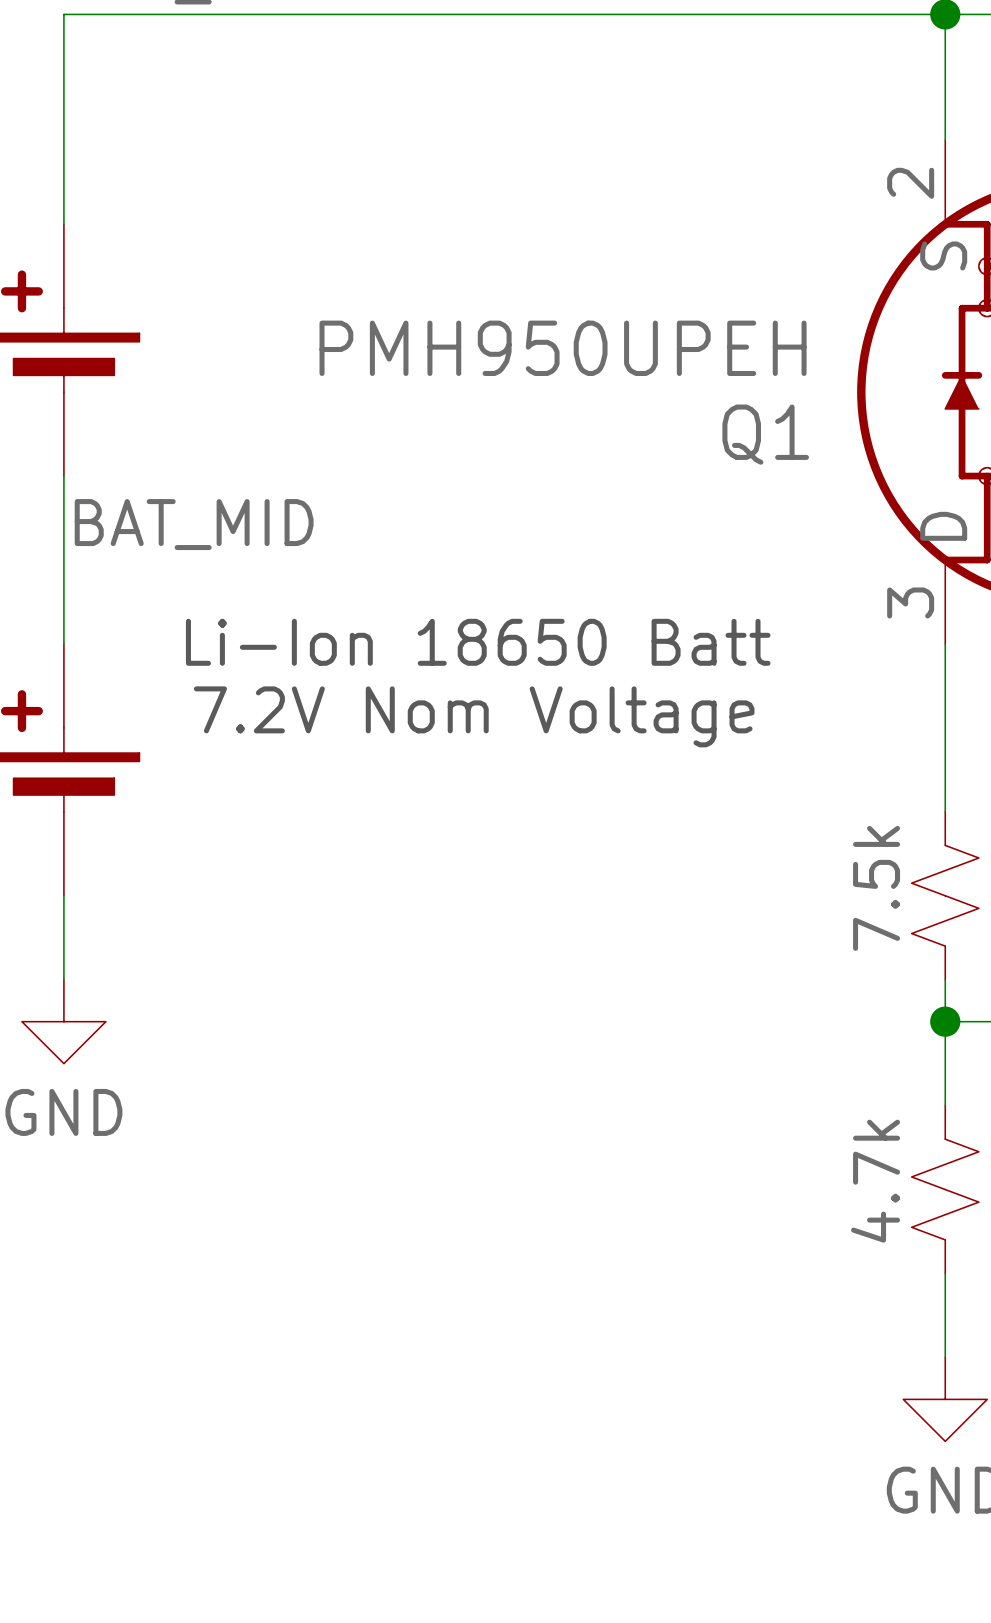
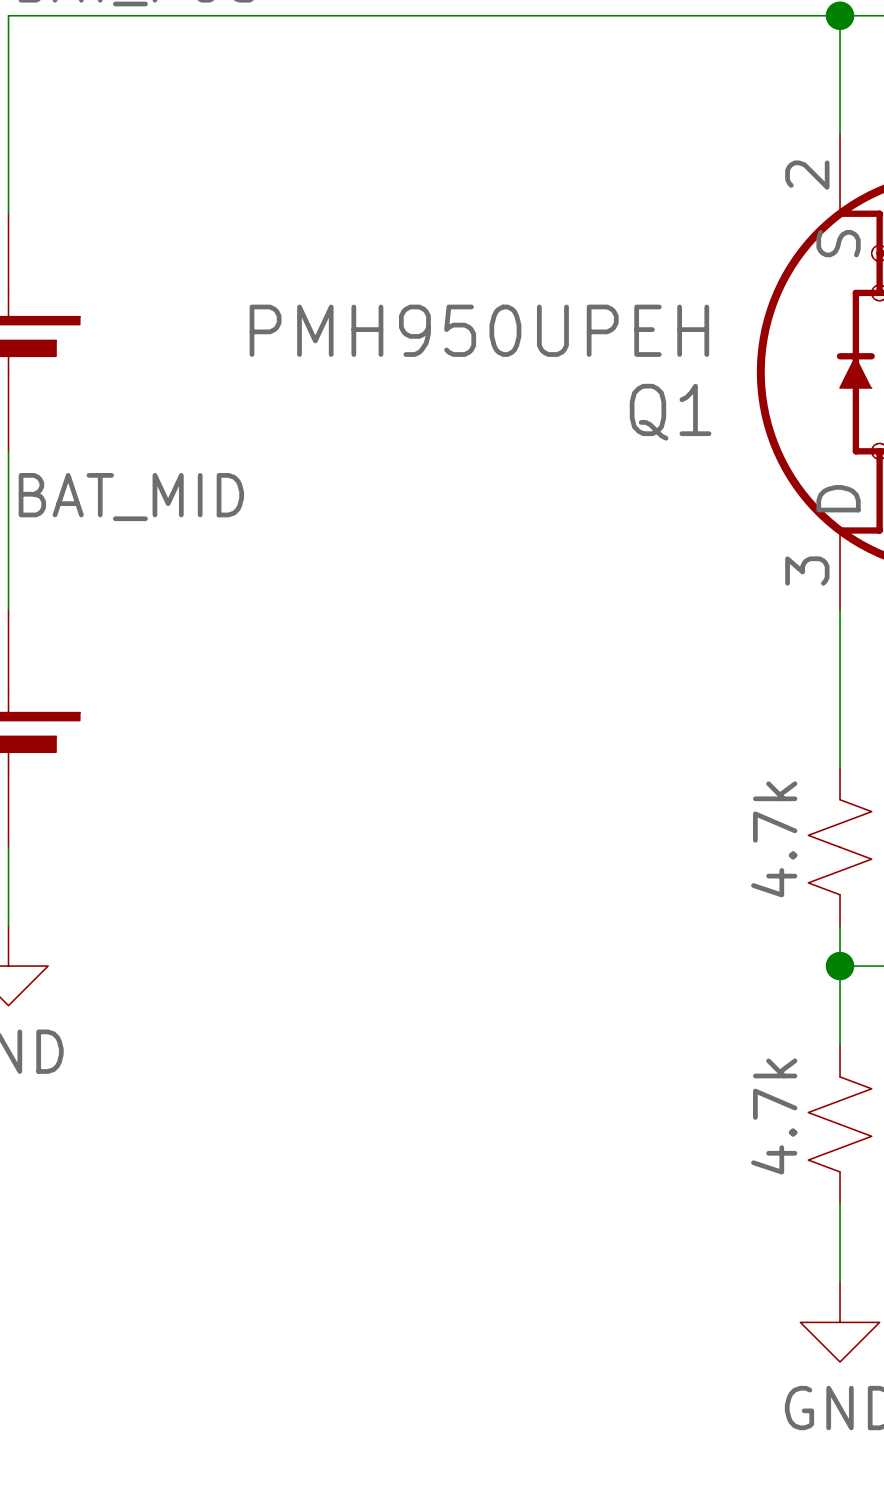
text: Li-Ion 18650 Batt (478, 642) -> none
text: 7.2V Nom Voltage (474, 716) -> none
part value: 7.5k (876, 888) -> 4.7k (774, 839)

